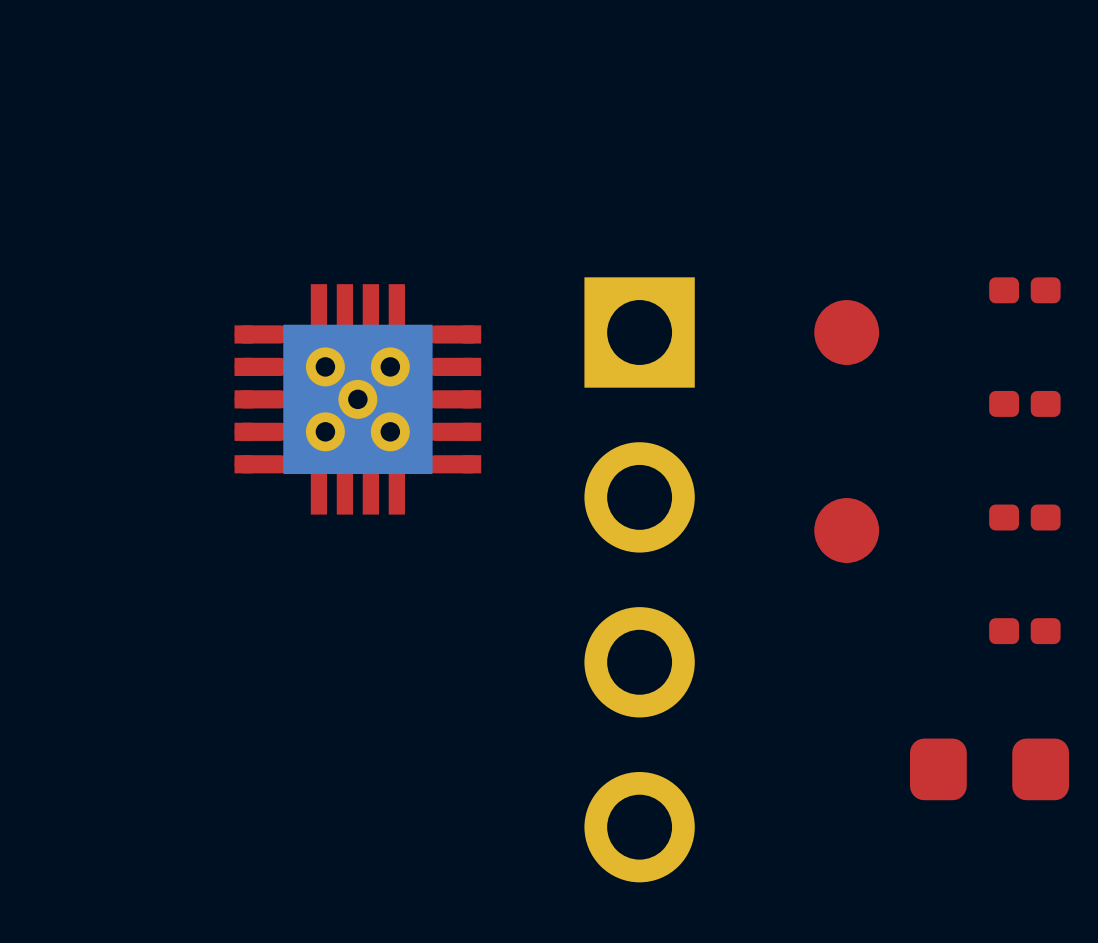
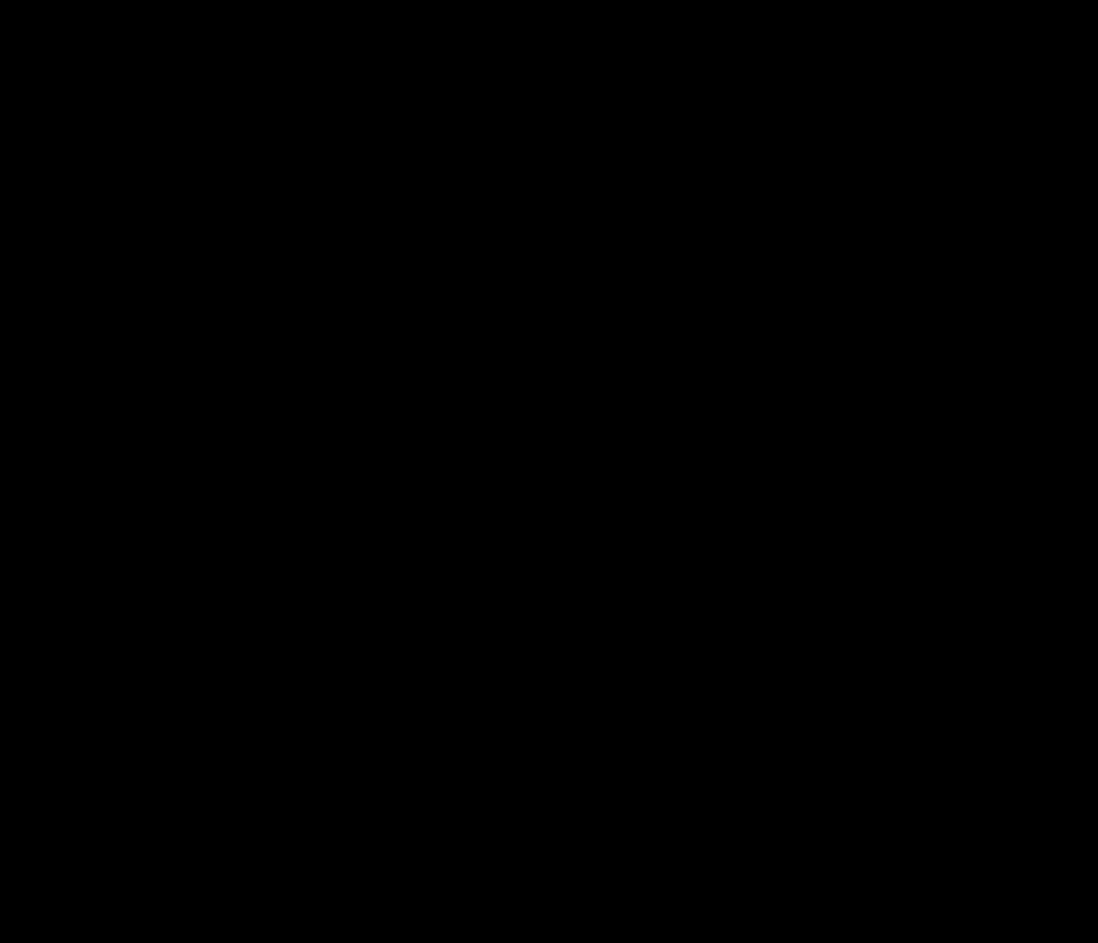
part: (1024, 290) -> none
part: (846, 332) -> none
part: (357, 399) -> none
part: (1024, 403) -> none
part: (1024, 517) -> none
part: (846, 530) -> none
part: (639, 579) -> none
part: (1024, 631) -> none
part: (989, 769) -> none

